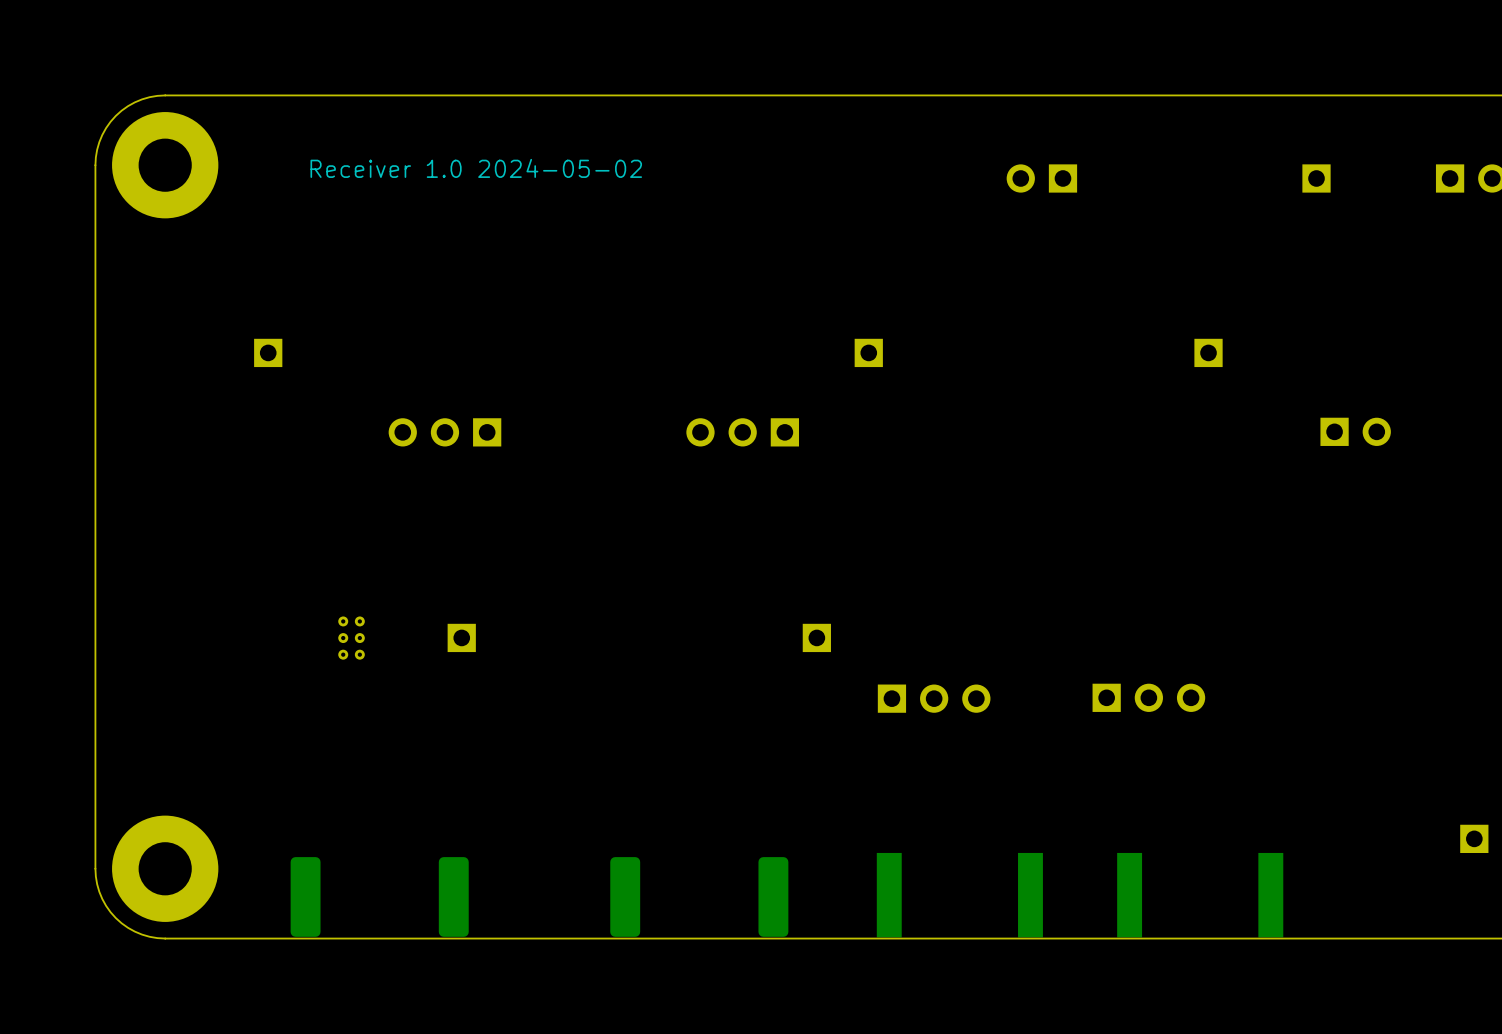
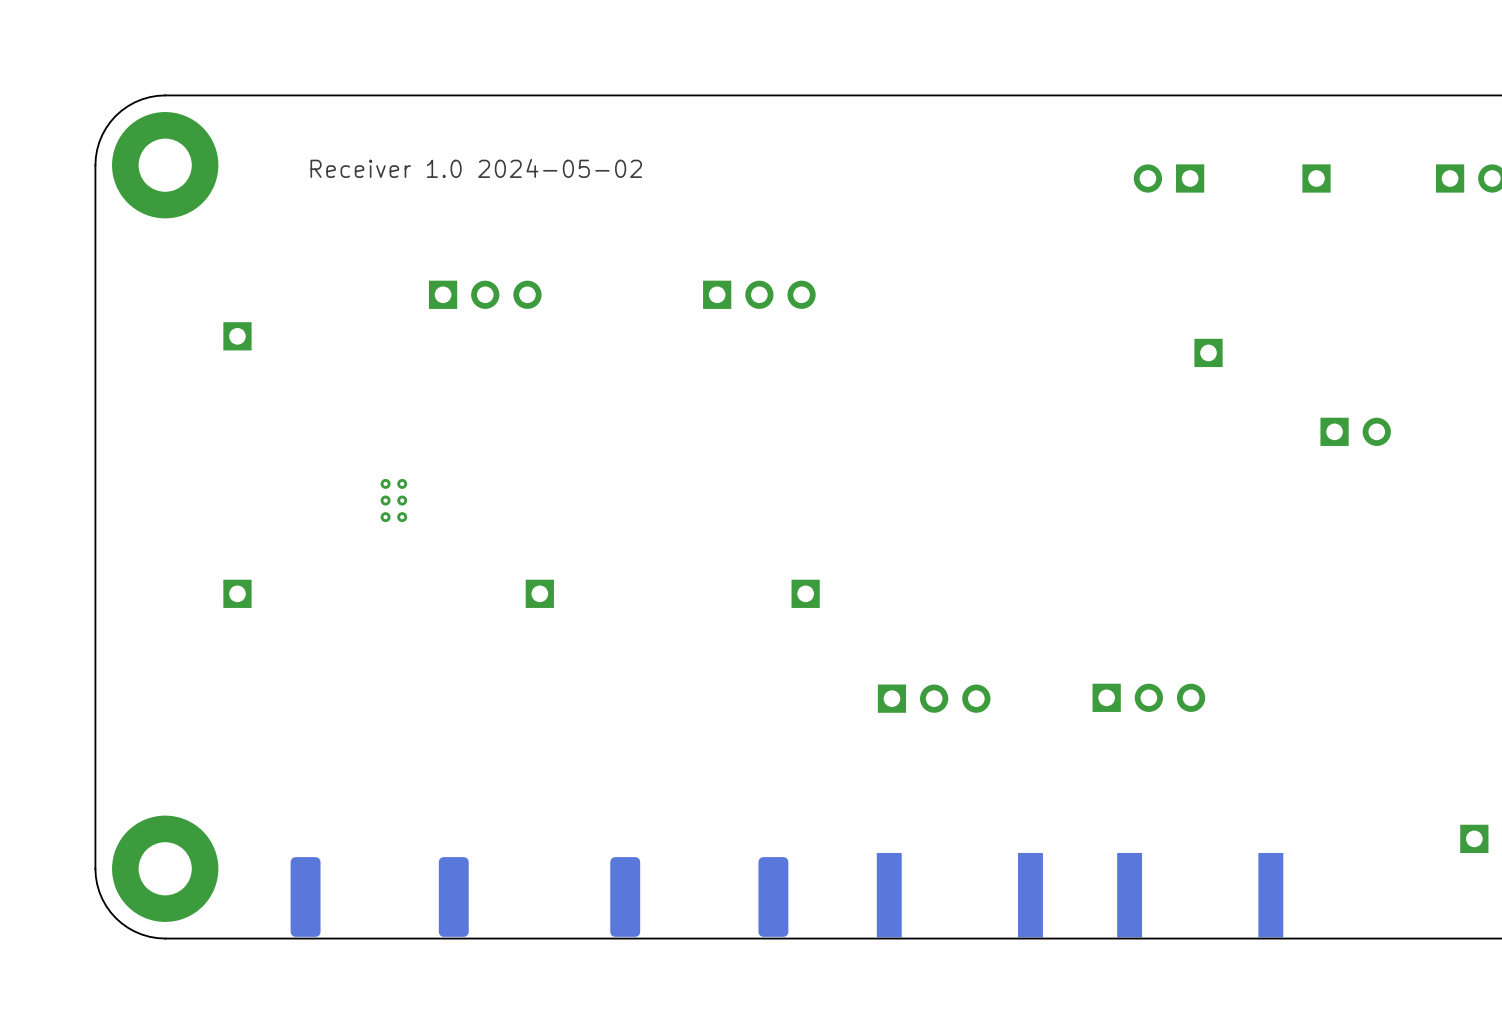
part position: (1041, 178) -> (1169, 178)
part position: (268, 352) -> (237, 336)
part: (868, 352) -> none
part rotation: 0° (444, 432) -> 180° (485, 294)
part position: (444, 432) -> (485, 294)
part rotation: 0° (742, 432) -> 180° (759, 294)
part position: (742, 432) -> (759, 294)
part: none -> (237, 593)
part position: (461, 637) -> (539, 593)
part position: (816, 637) -> (805, 593)
part position: (351, 638) -> (393, 500)

